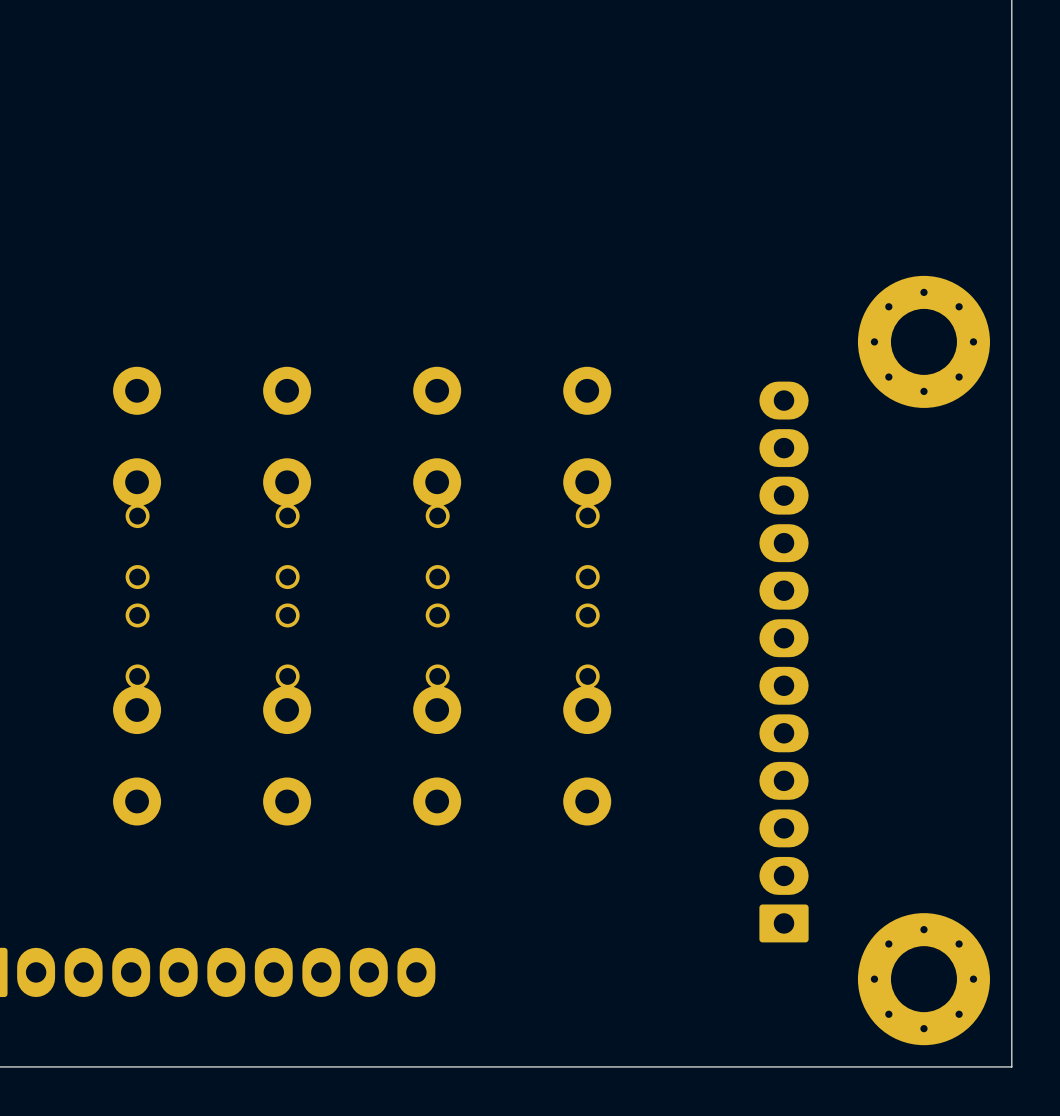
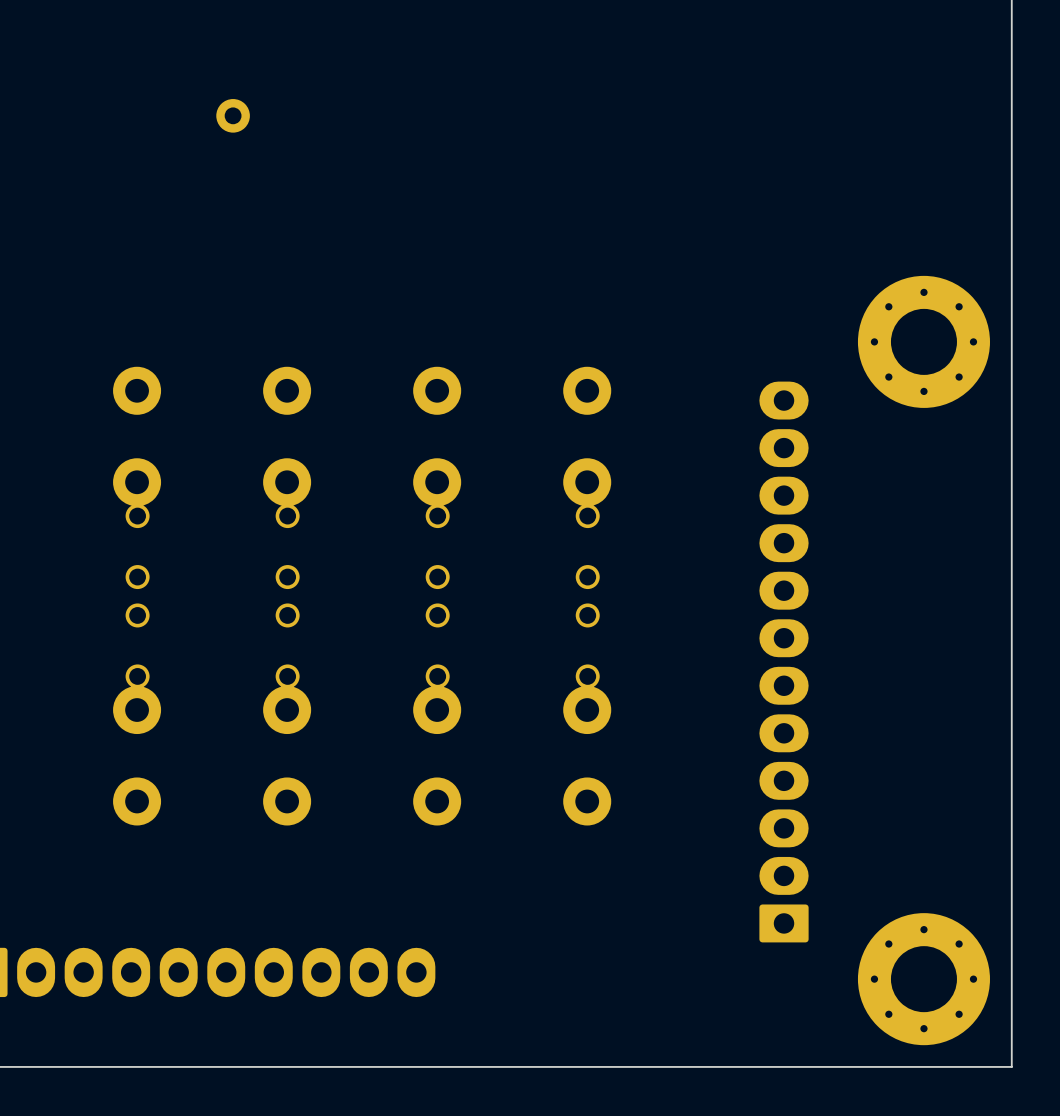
part: none -> (233, 115)

